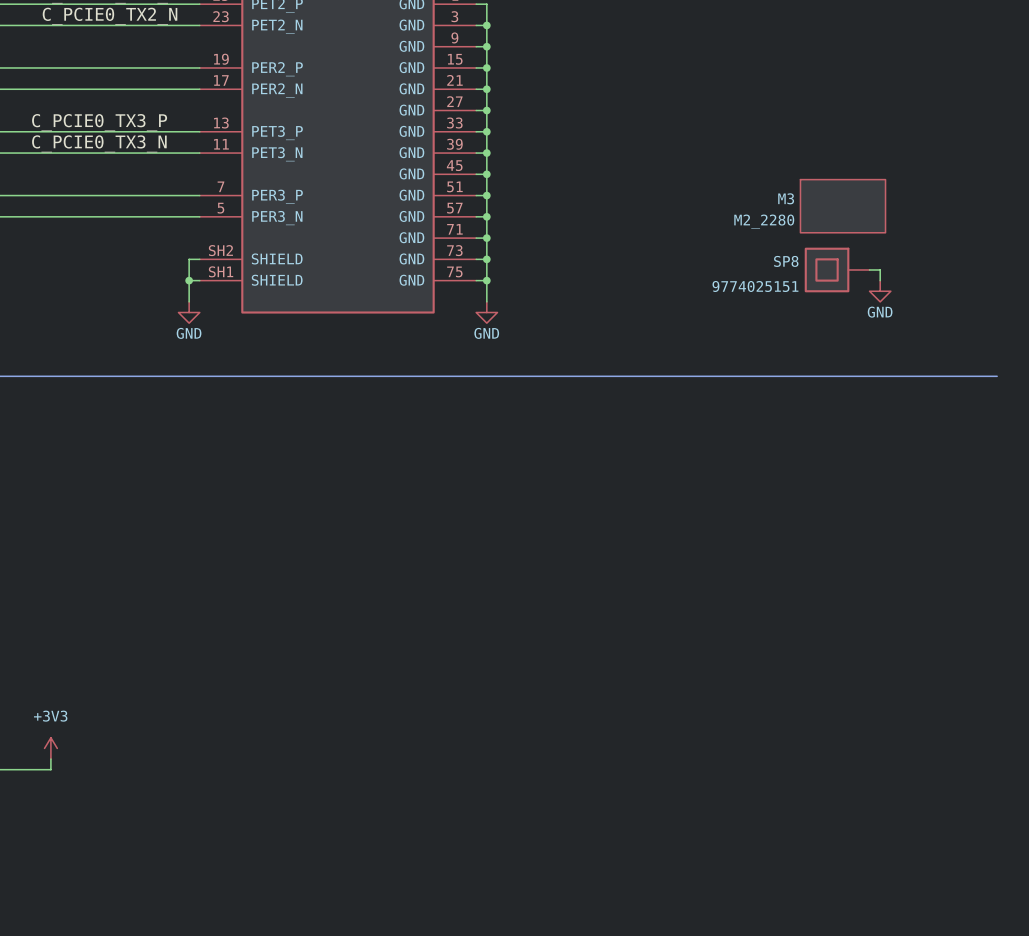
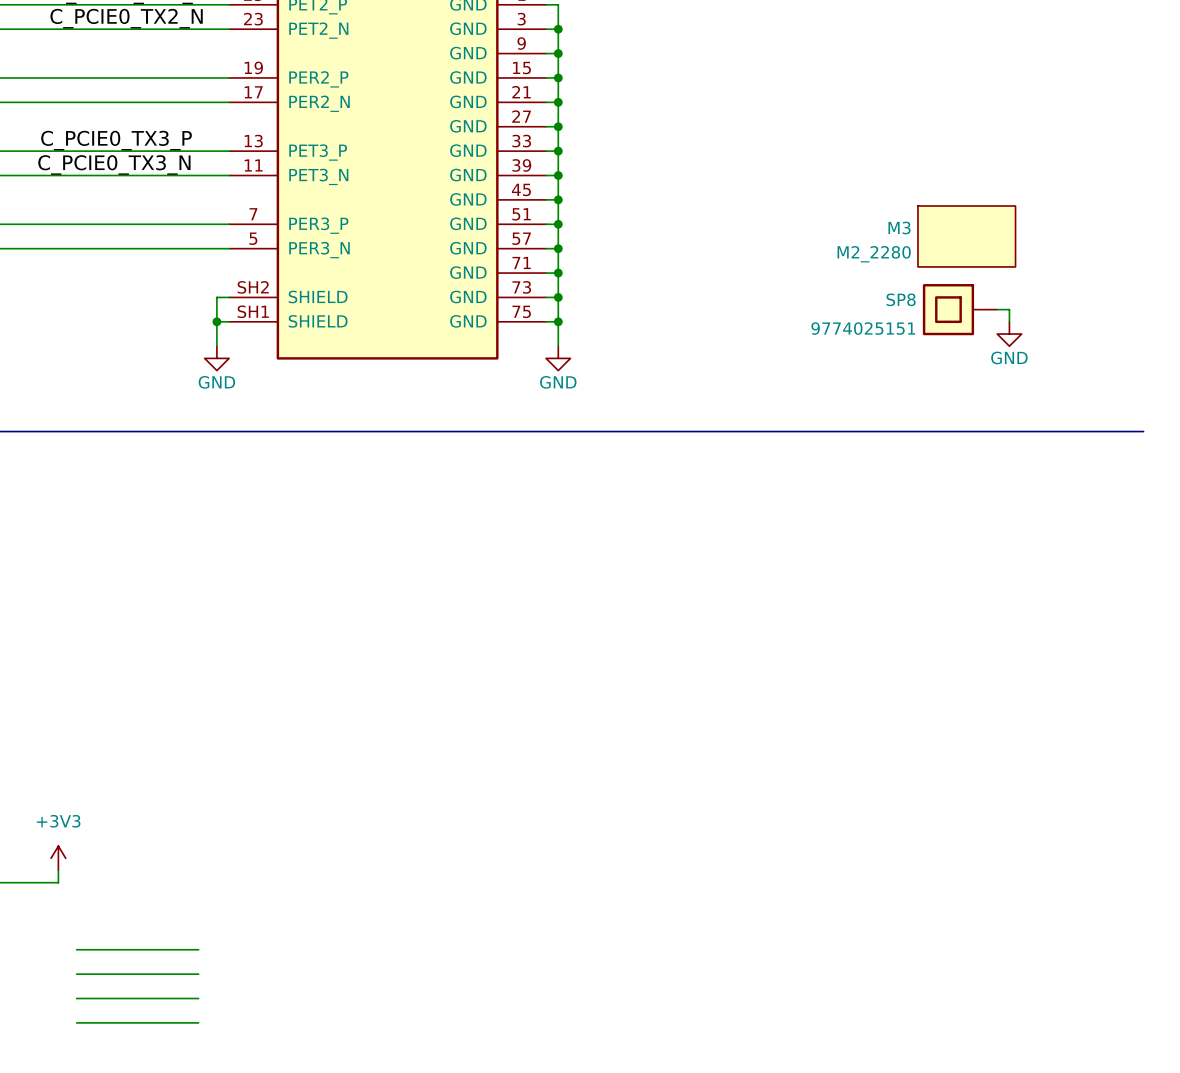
wire: none -> (76, 949) (198, 949)
wire: none -> (76, 974) (198, 974)
wire: none -> (76, 998) (198, 998)
wire: none -> (76, 1022) (198, 1022)

